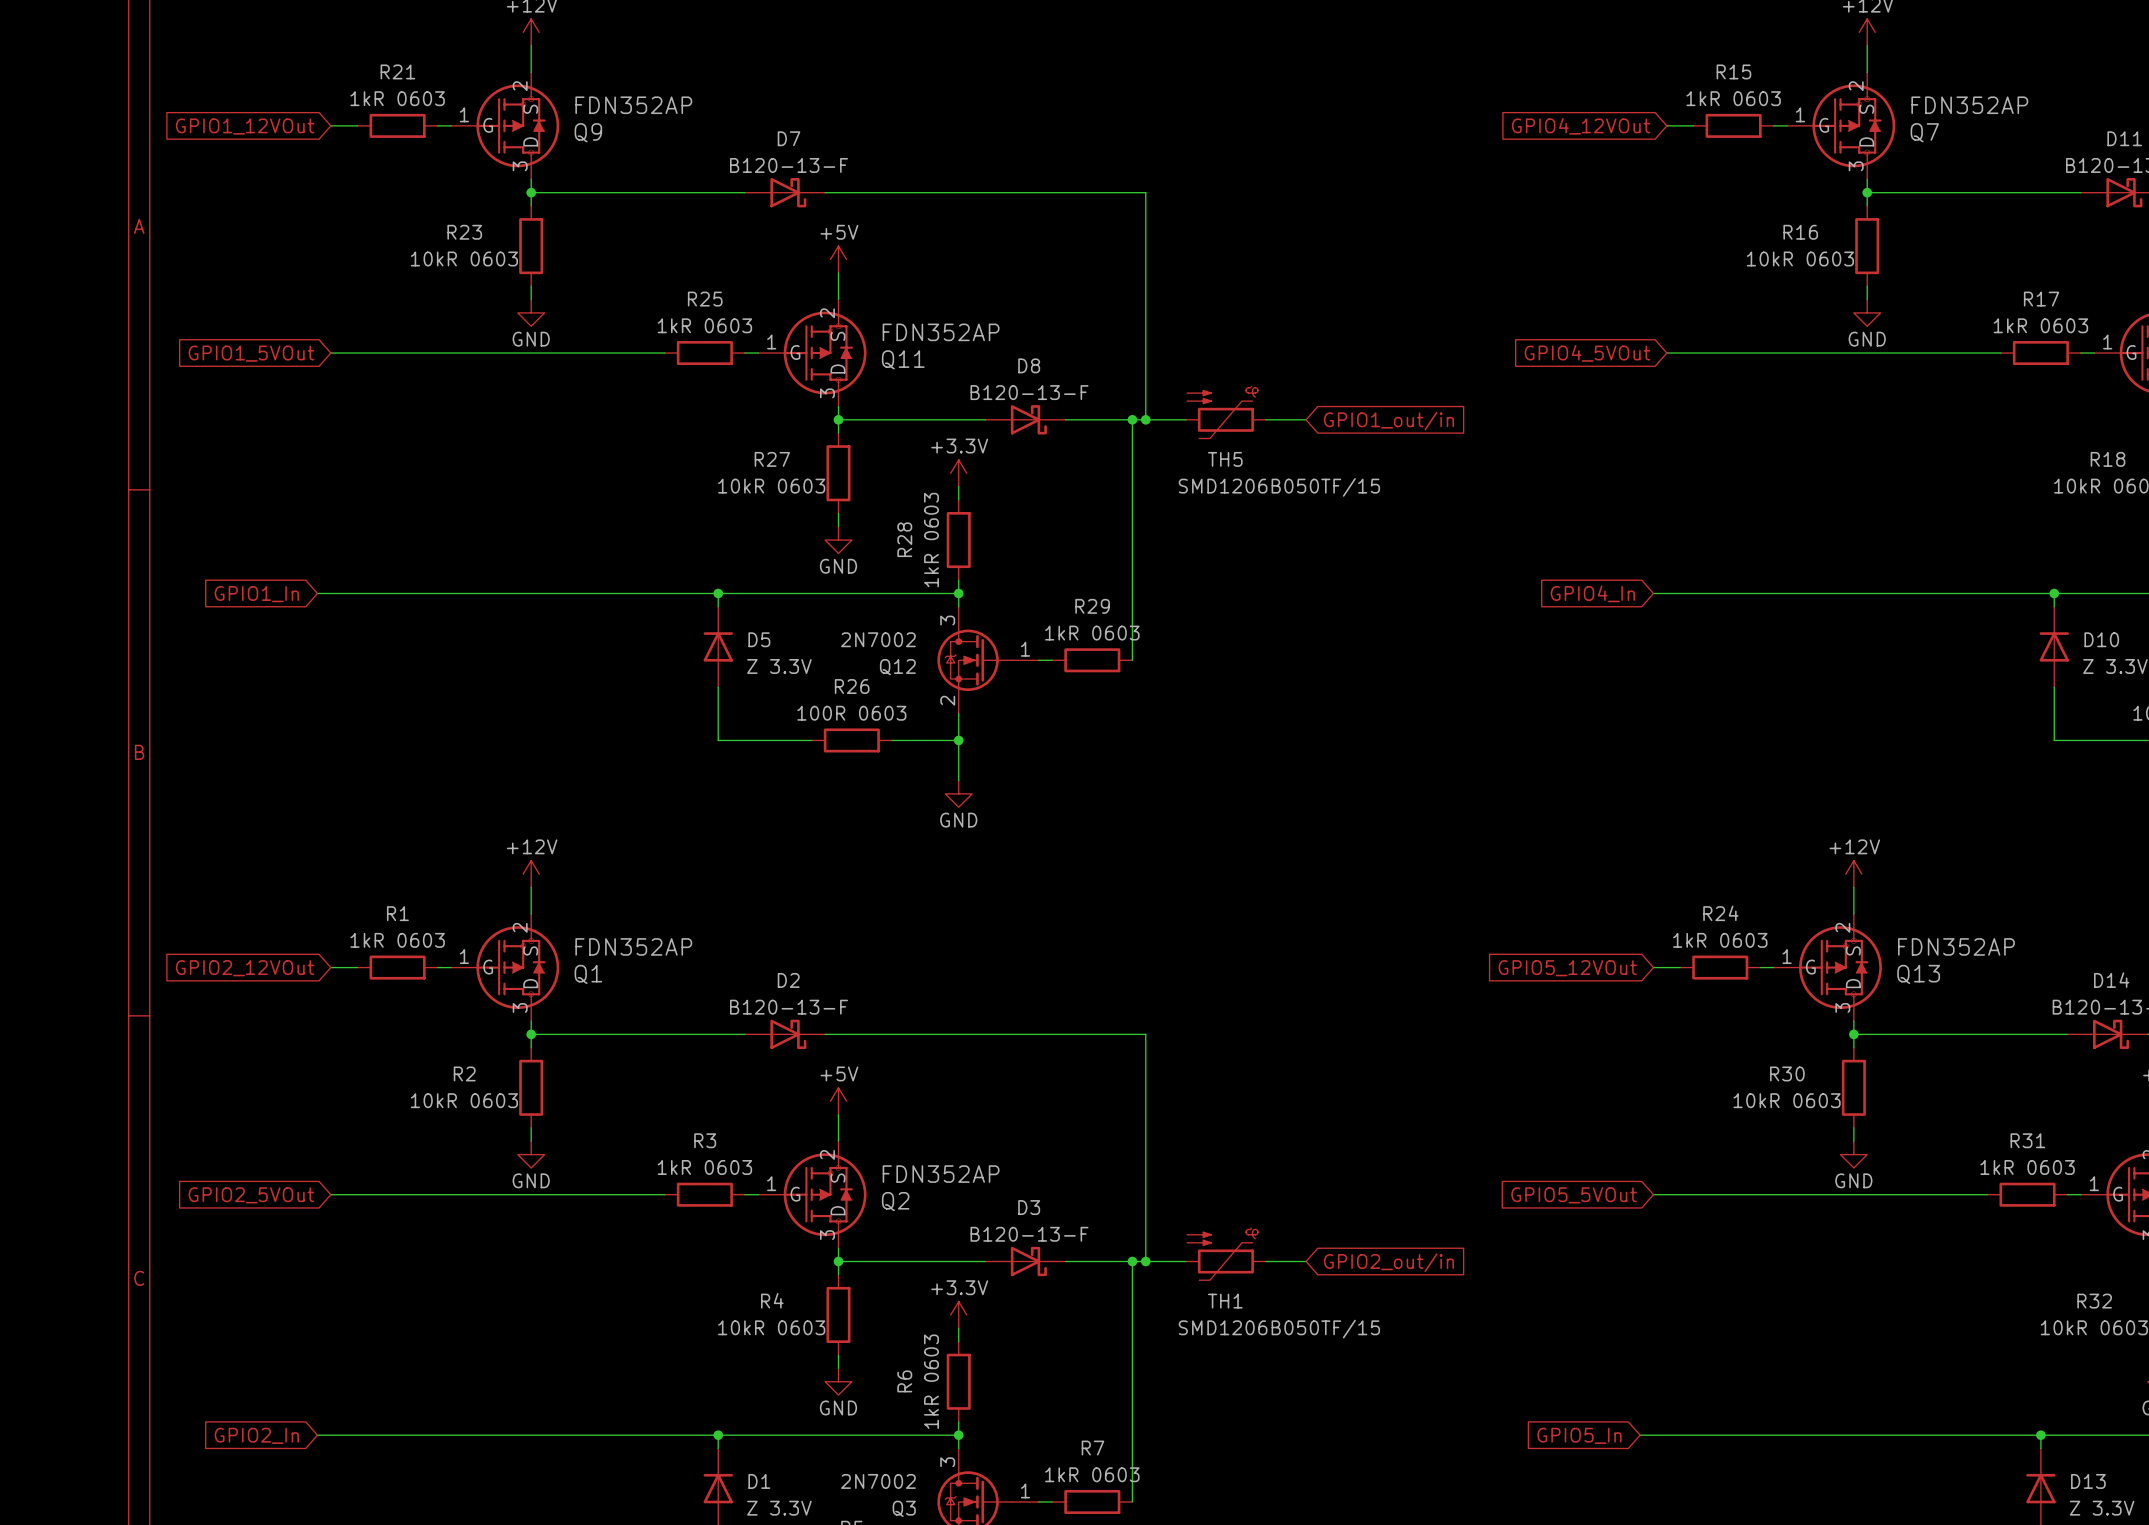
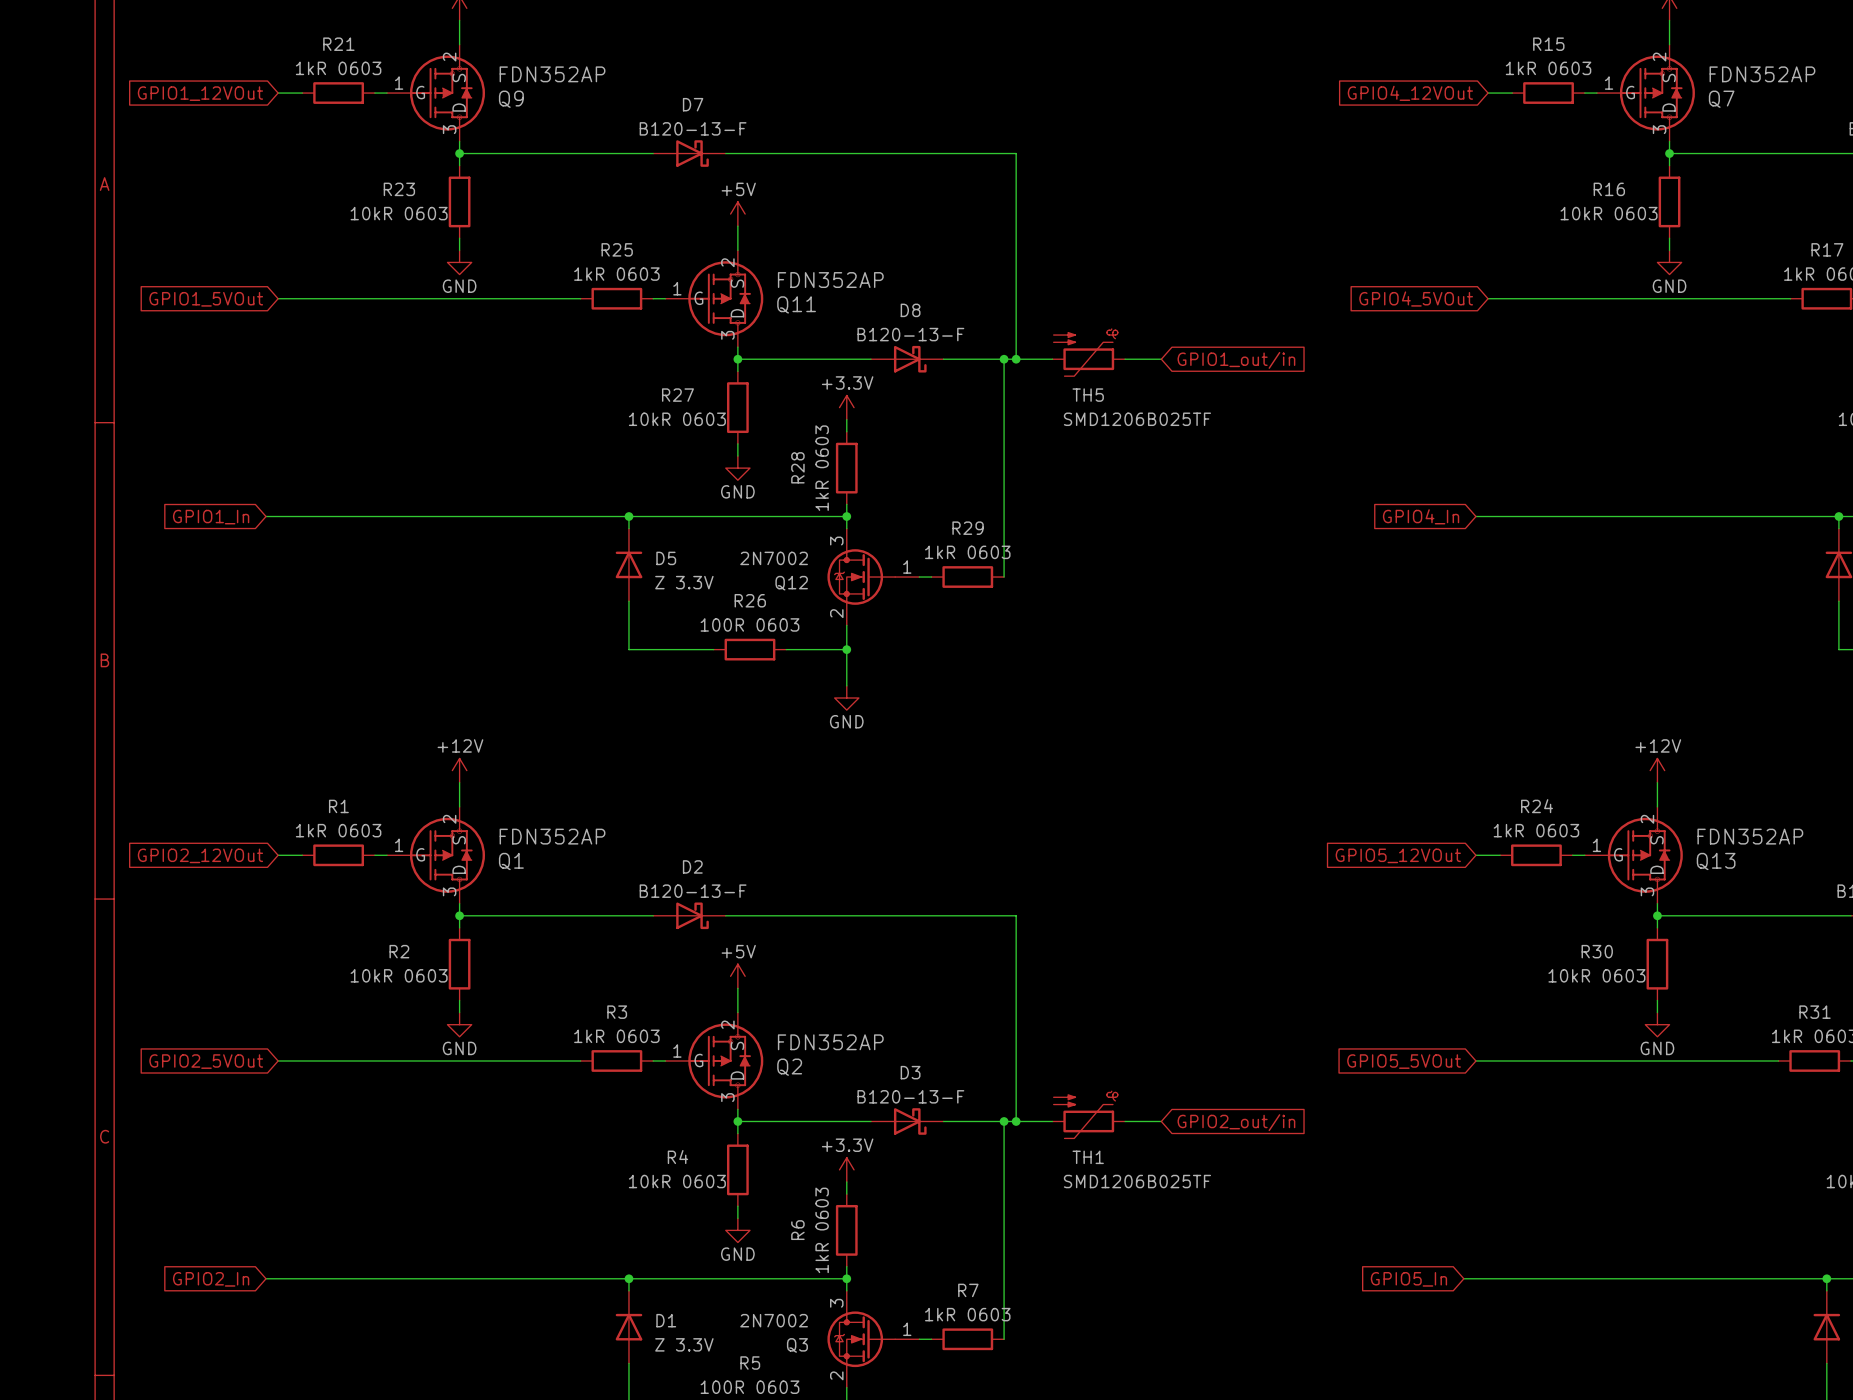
TH5 value: SMD1206B050TF/15 (1279, 487) -> SMD1206B025TF (1137, 419)
TH1 value: SMD1206B050TF/15 (1279, 1329) -> SMD1206B025TF (1137, 1181)

